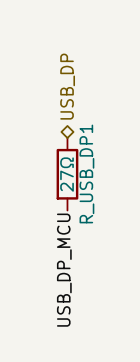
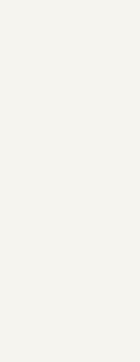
hierarchical label: USB_DP (67, 86) -> none
R_USB_DP1: 27Ω (67, 174) -> none
label: USB_DP_MCU (64, 270) -> none

